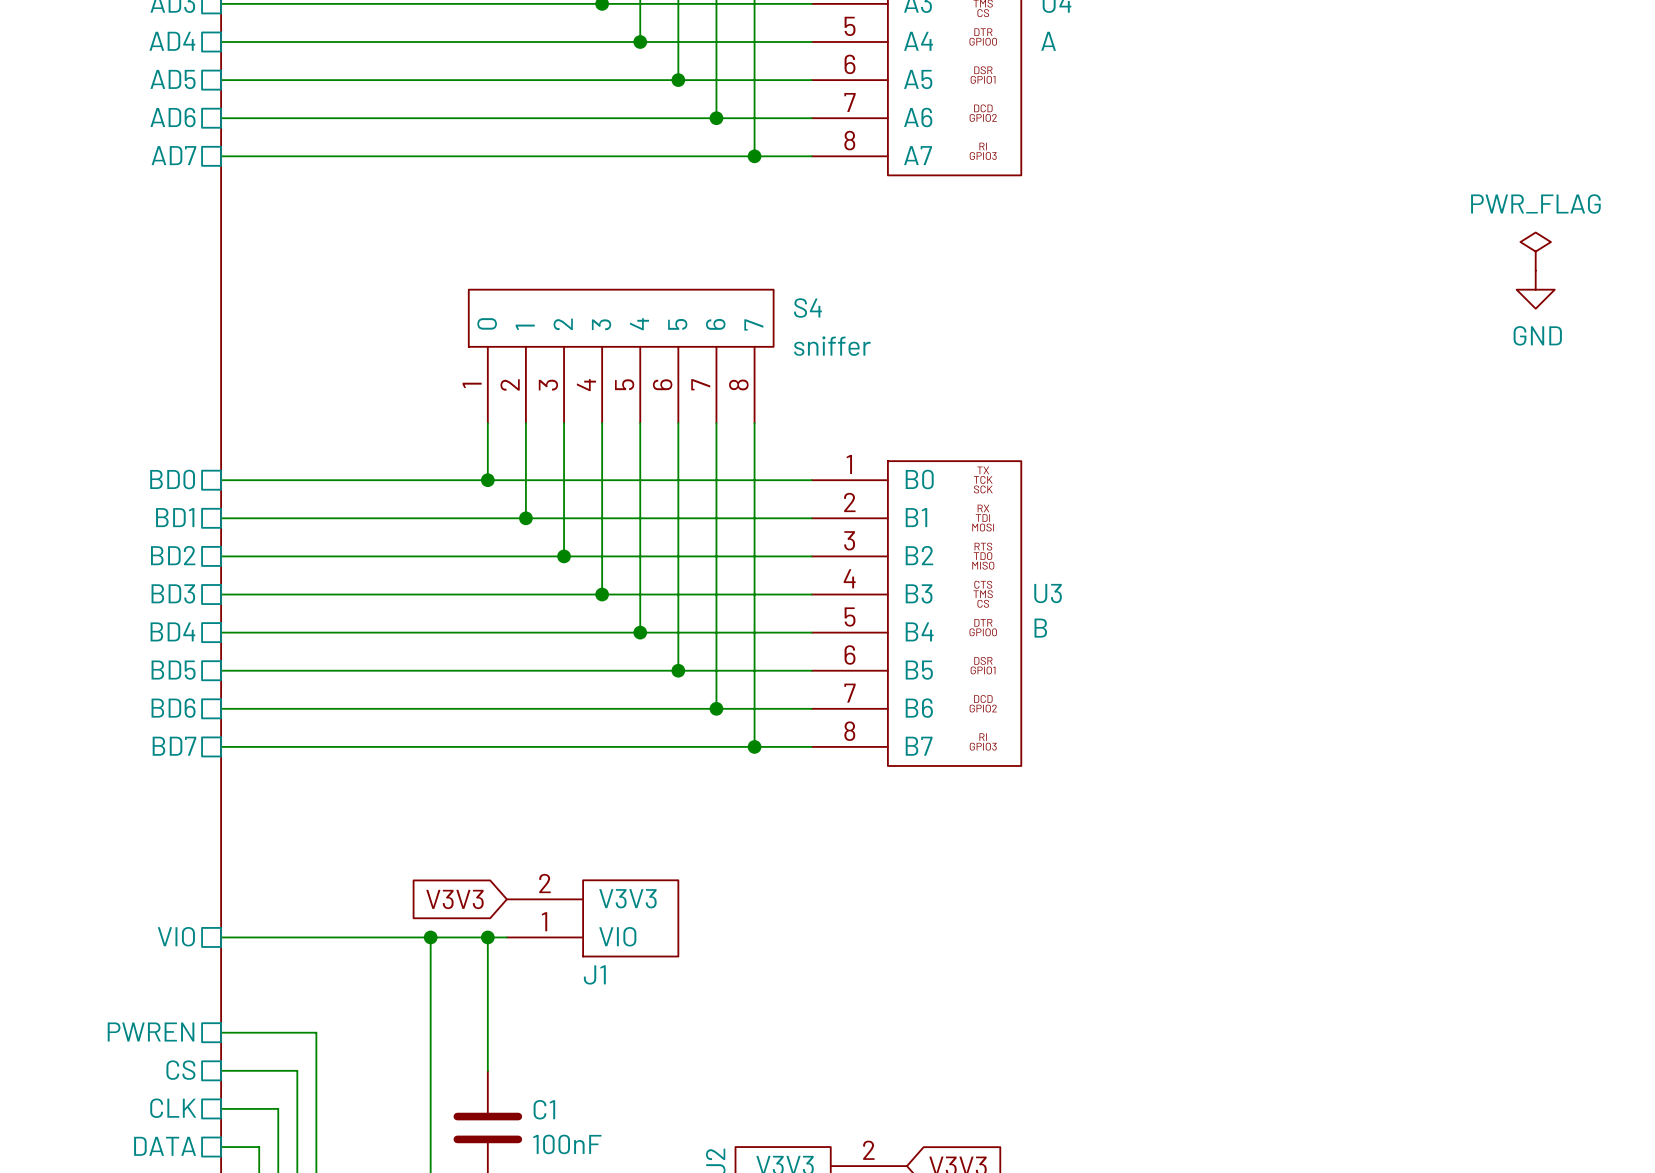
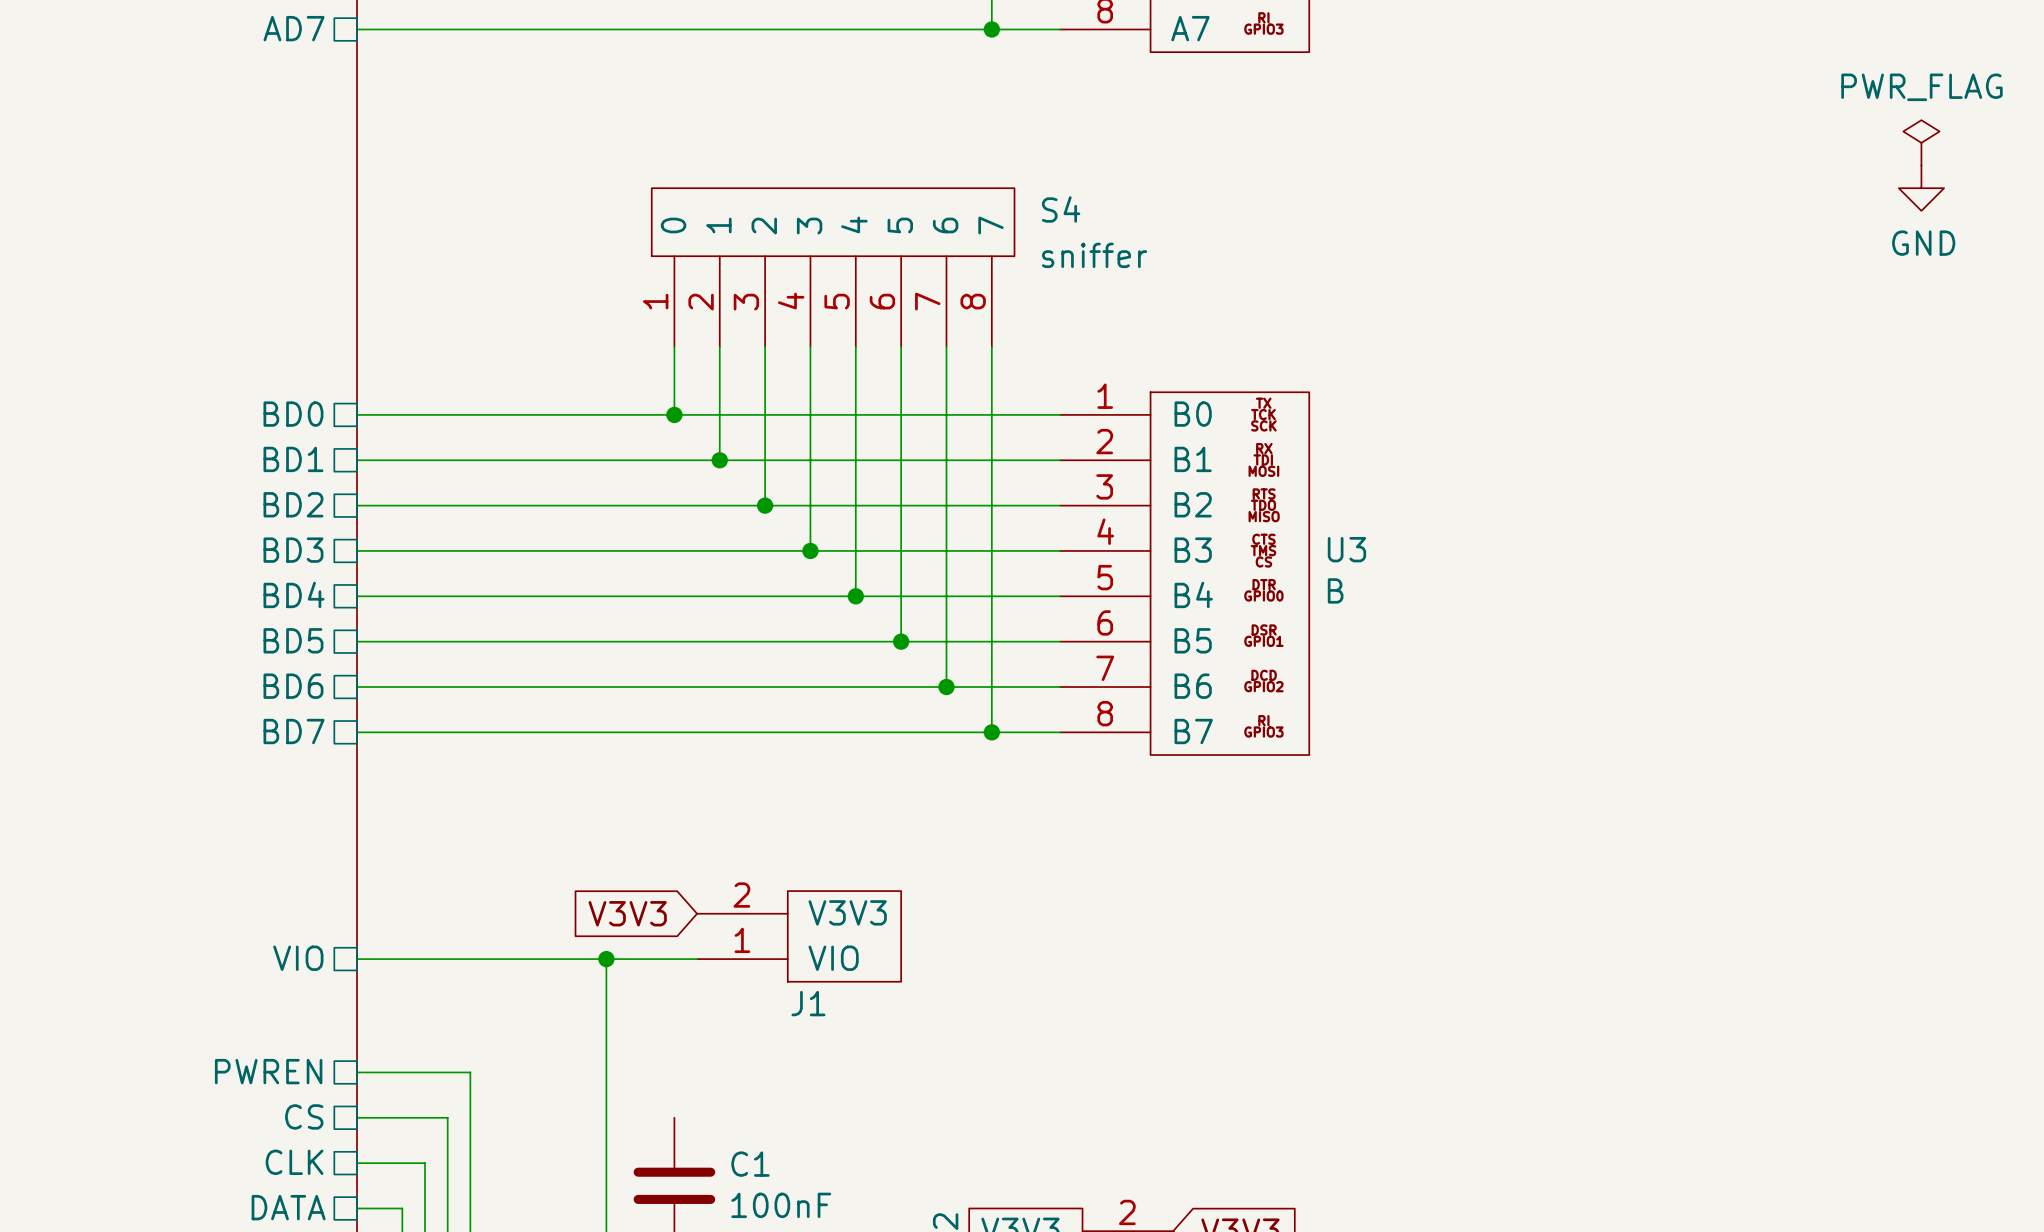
wire: (487, 937) (487, 1070) -> none
junction: (487, 937) -> none

